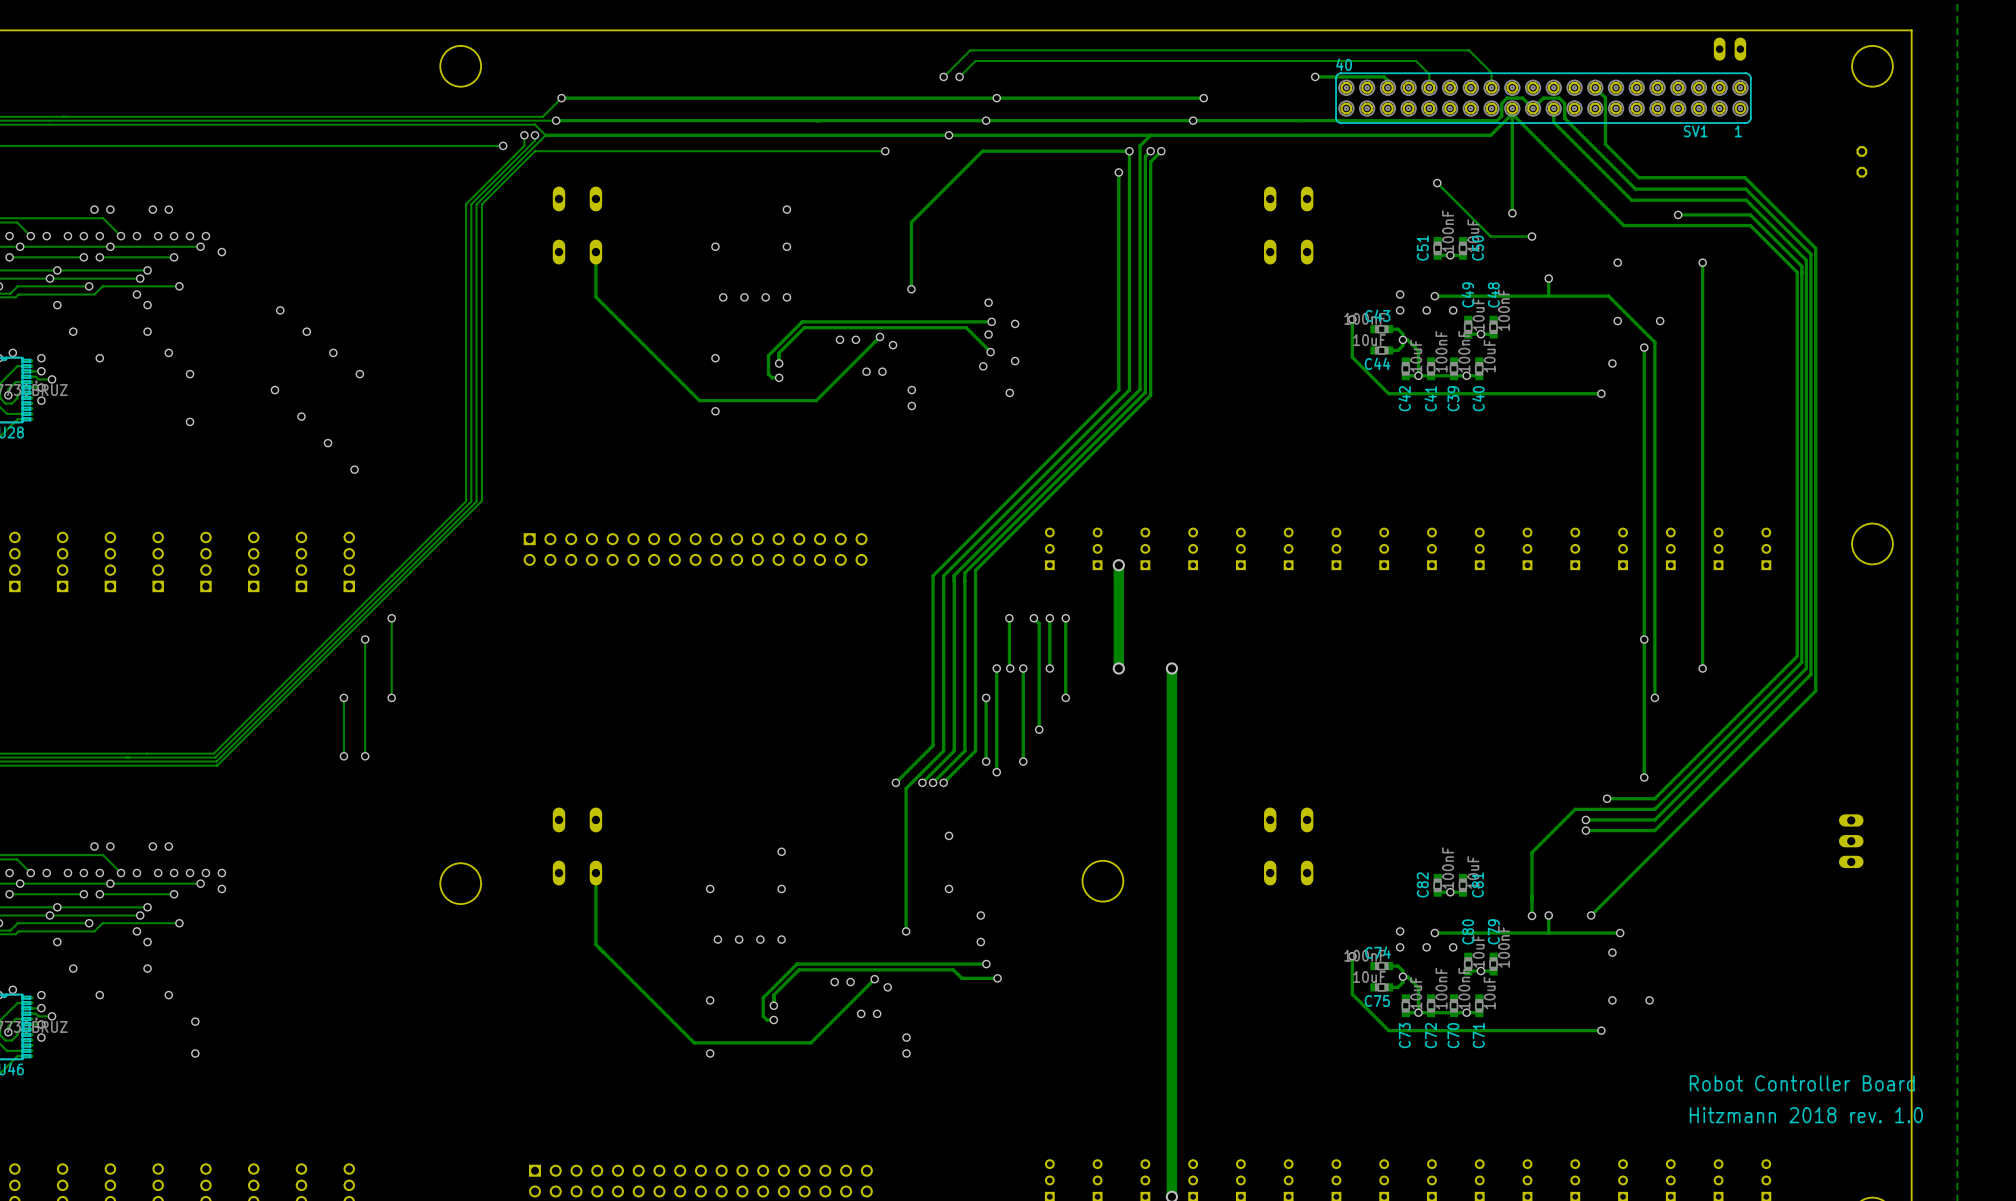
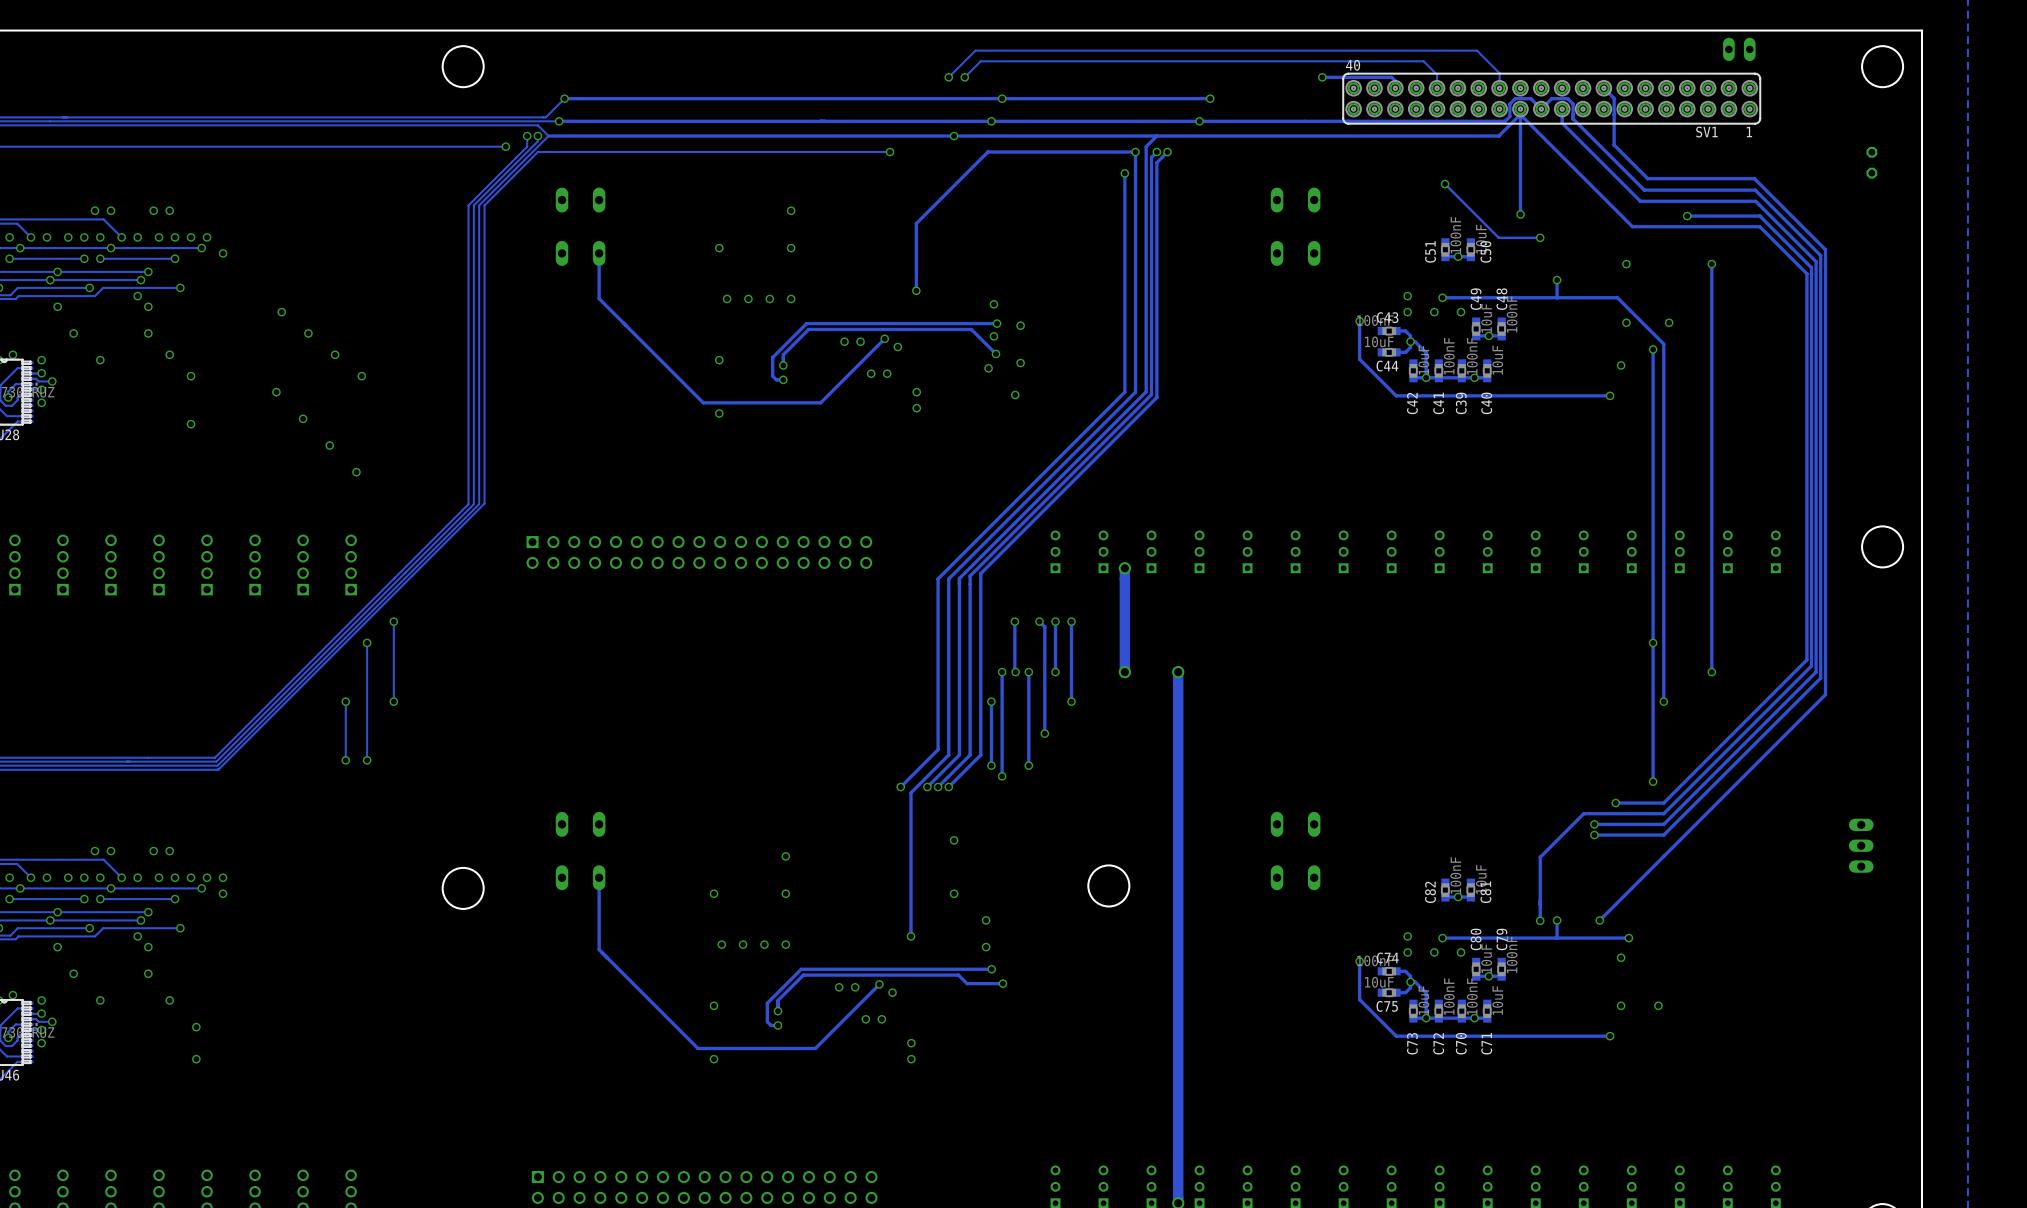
text: Robot Controller Board (1802, 1083) -> none
text: Hitzmann 2018 rev. 1.0 (1806, 1115) -> none

